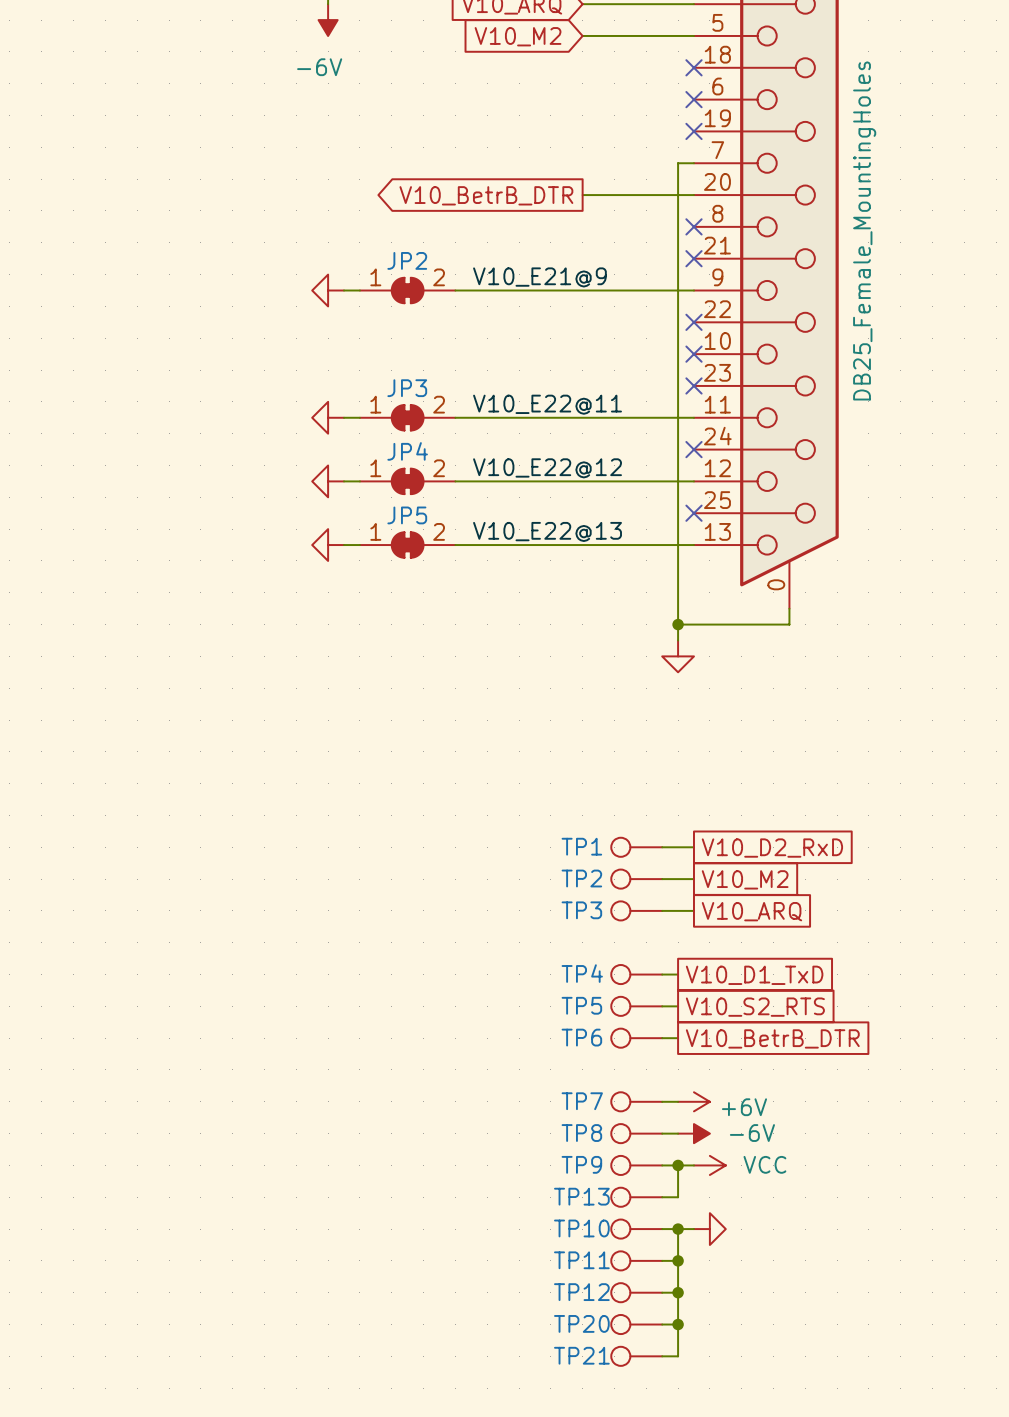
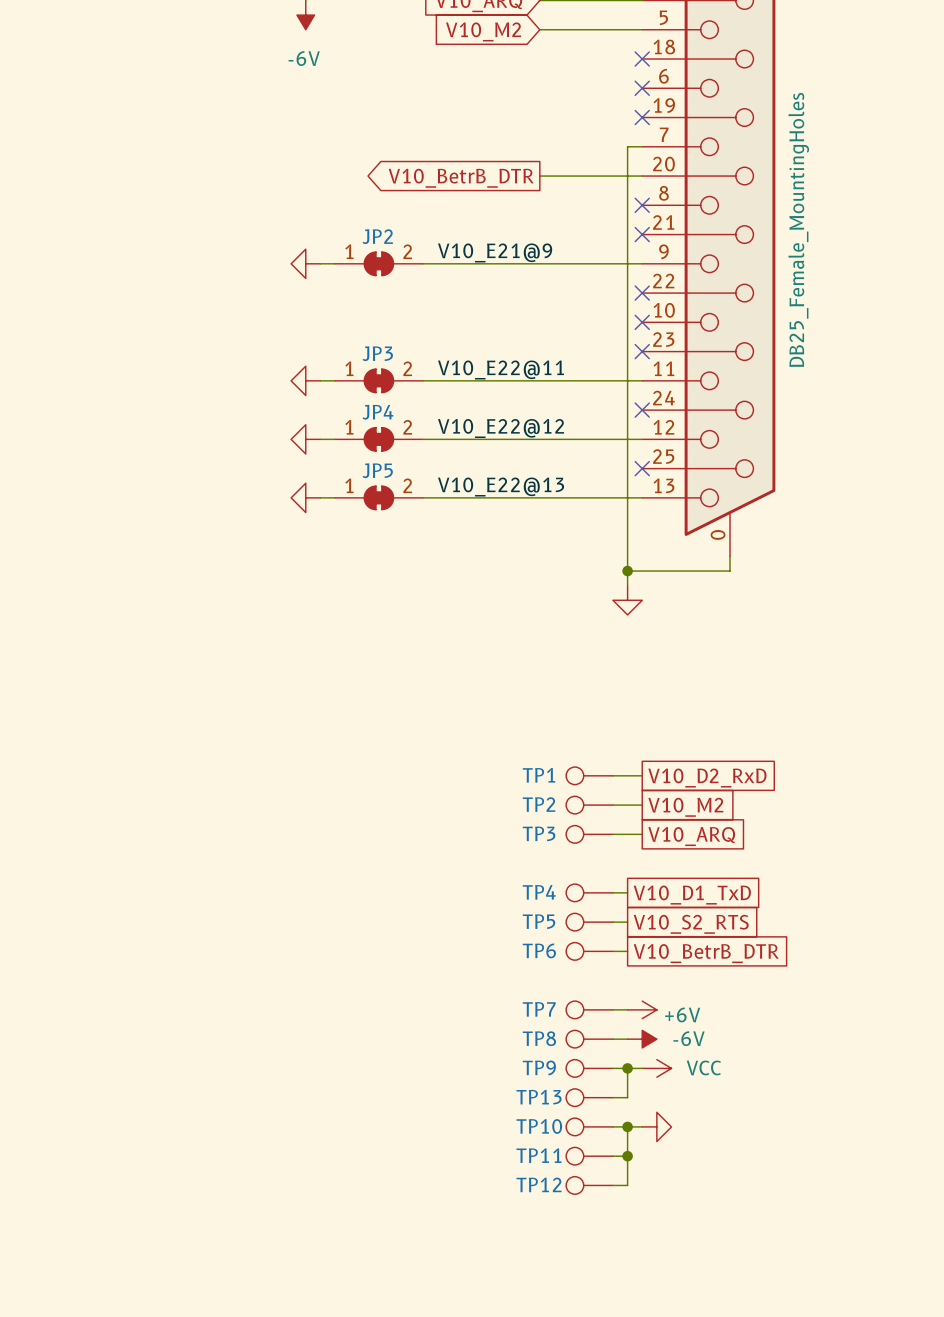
wire: (678, 1292) (678, 1356) (662, 1356) -> none
junction: (678, 1292) -> none
TP20: (636, 1324) -> none
wire: (662, 1324) (678, 1324) -> none
junction: (678, 1324) -> none
TP21: (636, 1356) -> none

